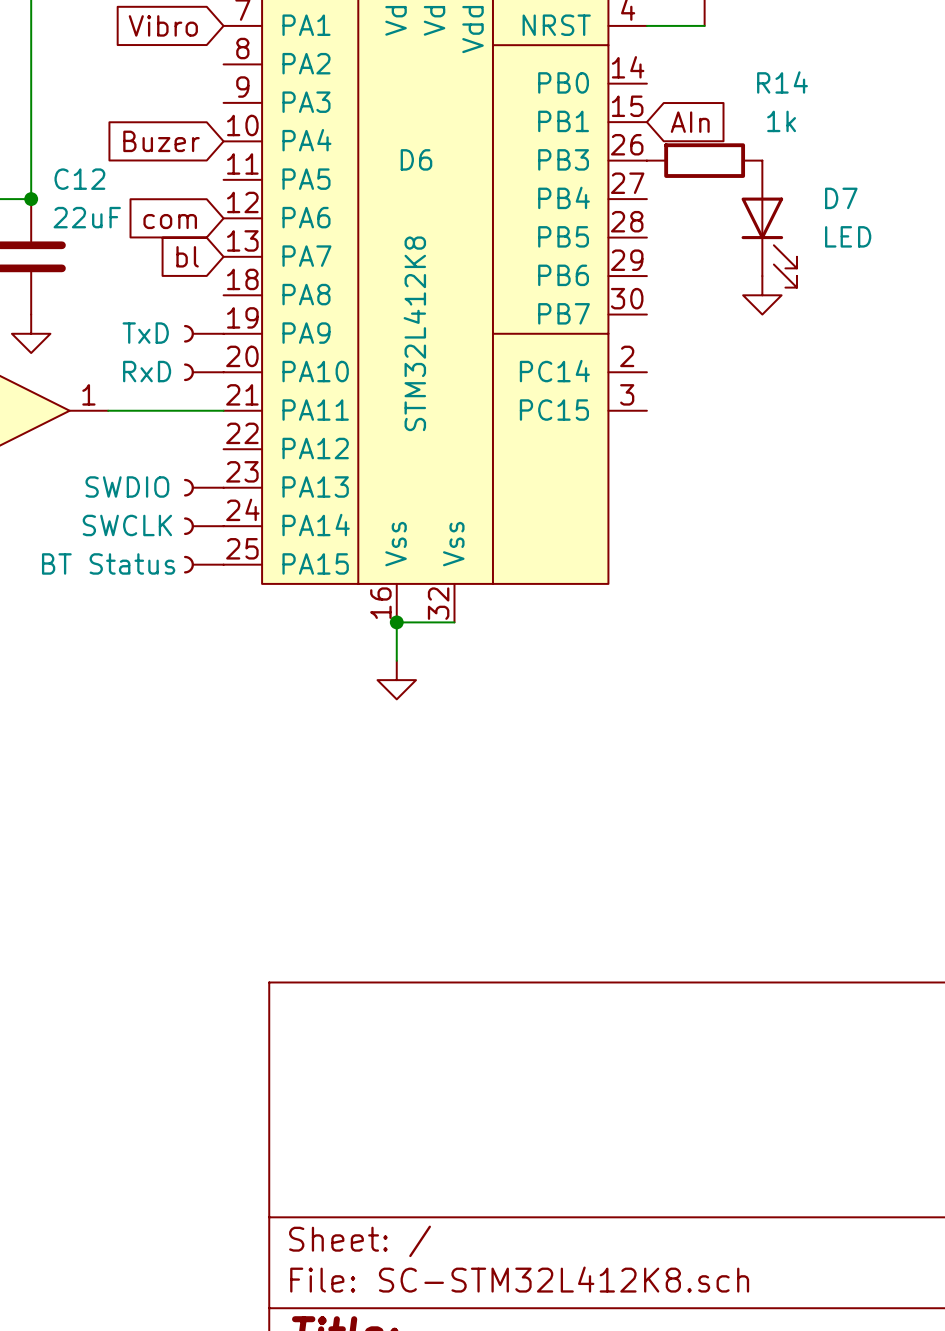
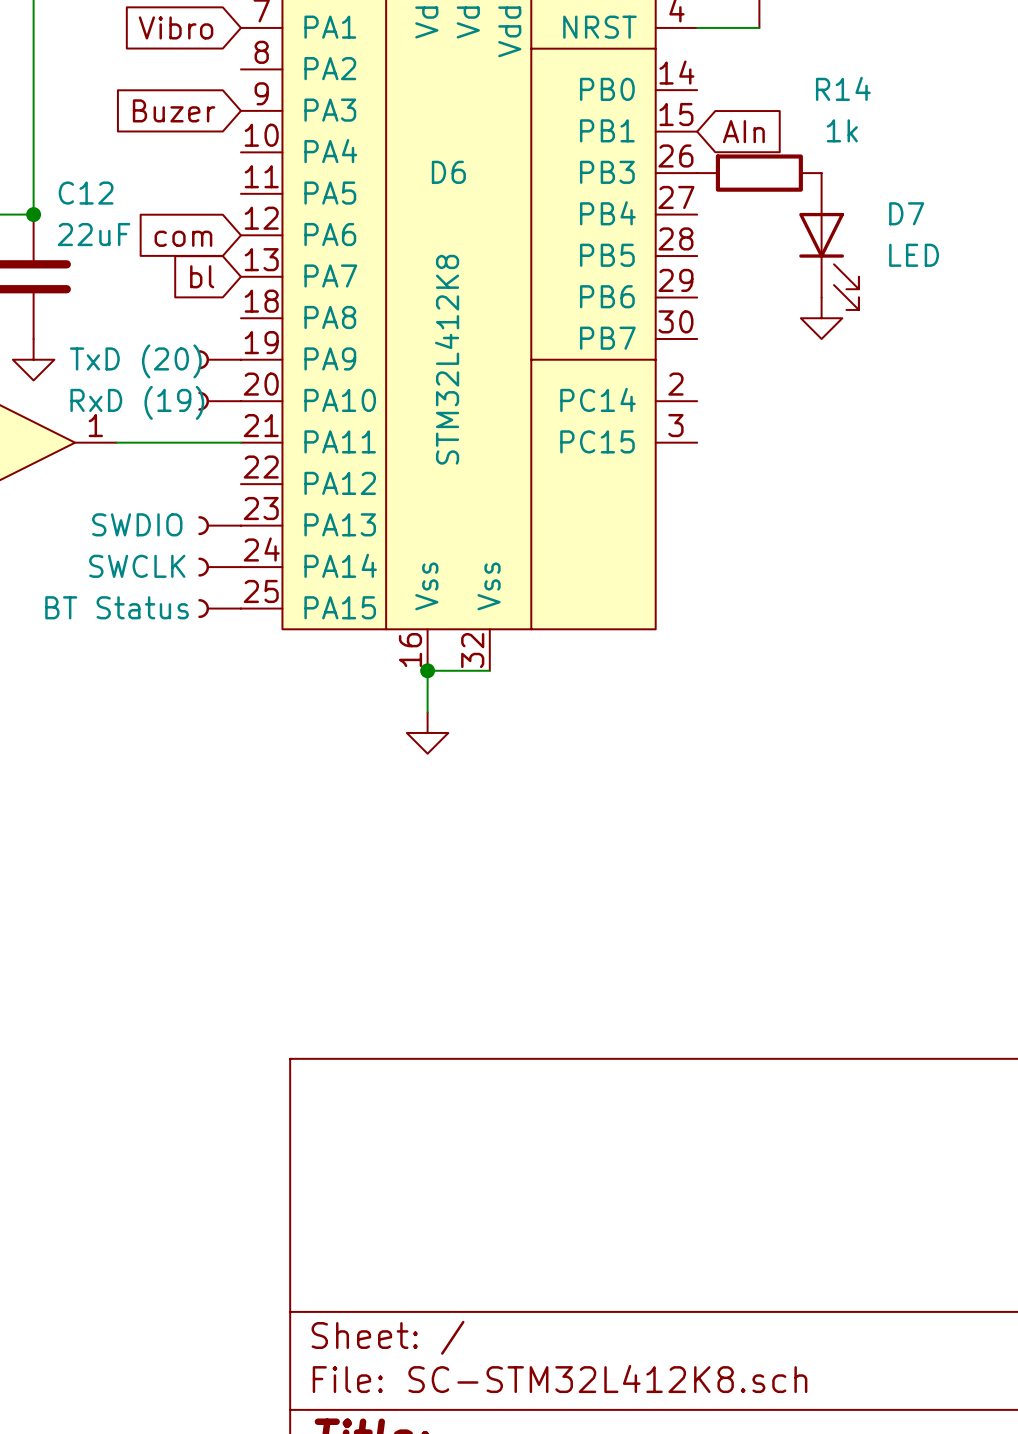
global label position: Buzer (161, 141) -> Buzer (174, 110)
part value: TxD (145, 333) -> TxD (20) (135, 361)
part value: RxD (147, 371) -> RxD (19) (137, 402)

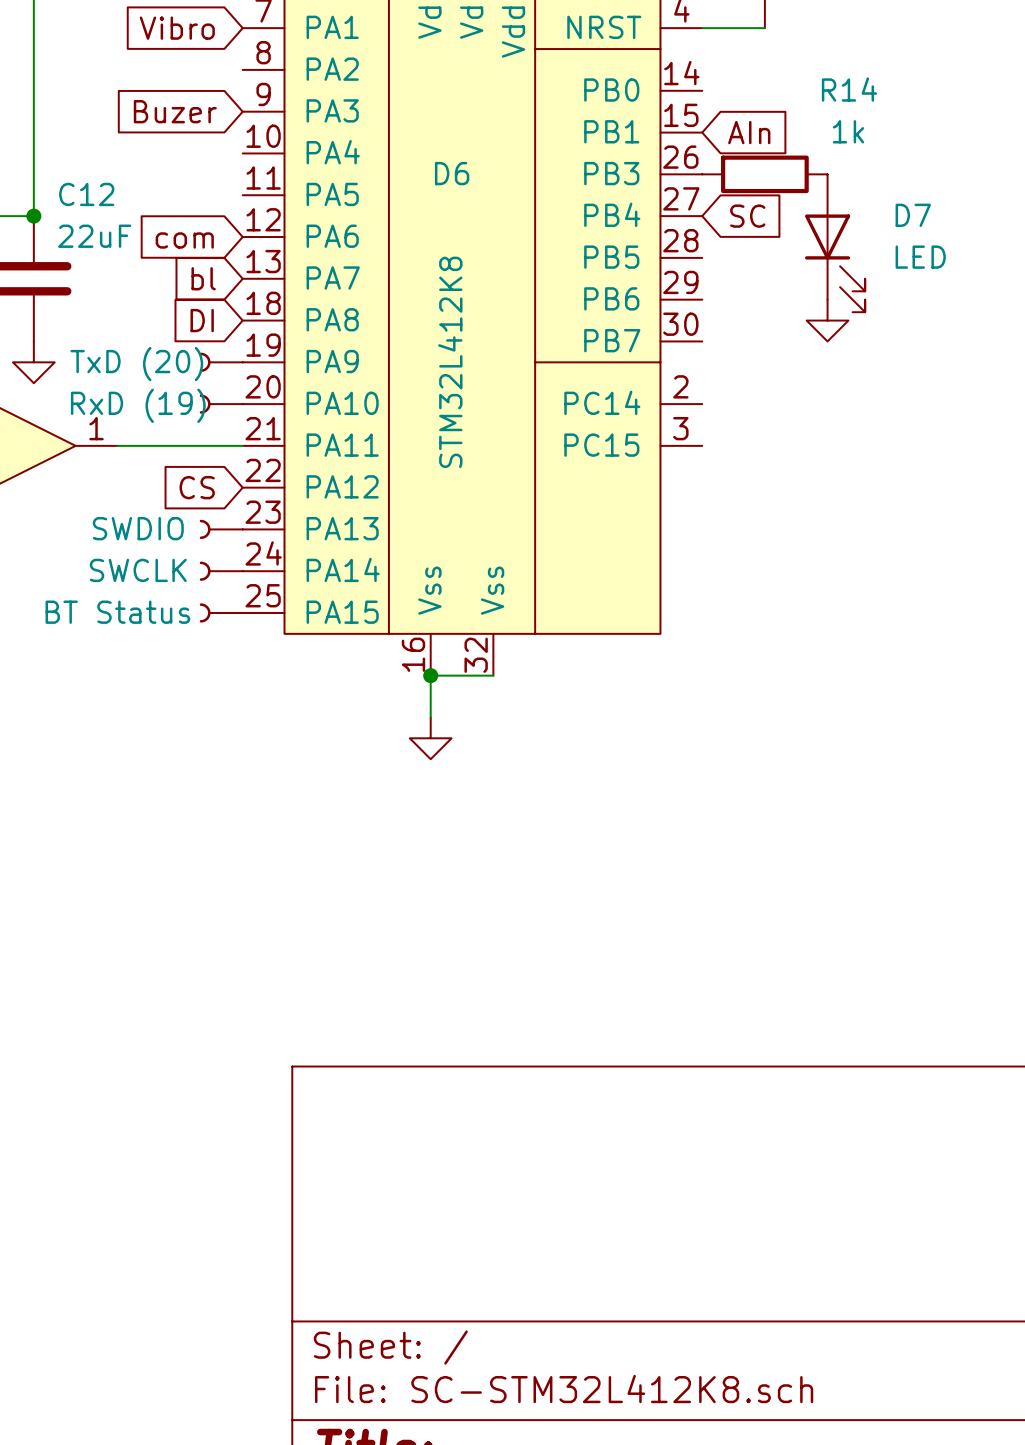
global label: none -> SC (747, 216)
global label: none -> DI (202, 320)
global label: none -> CS (197, 487)

